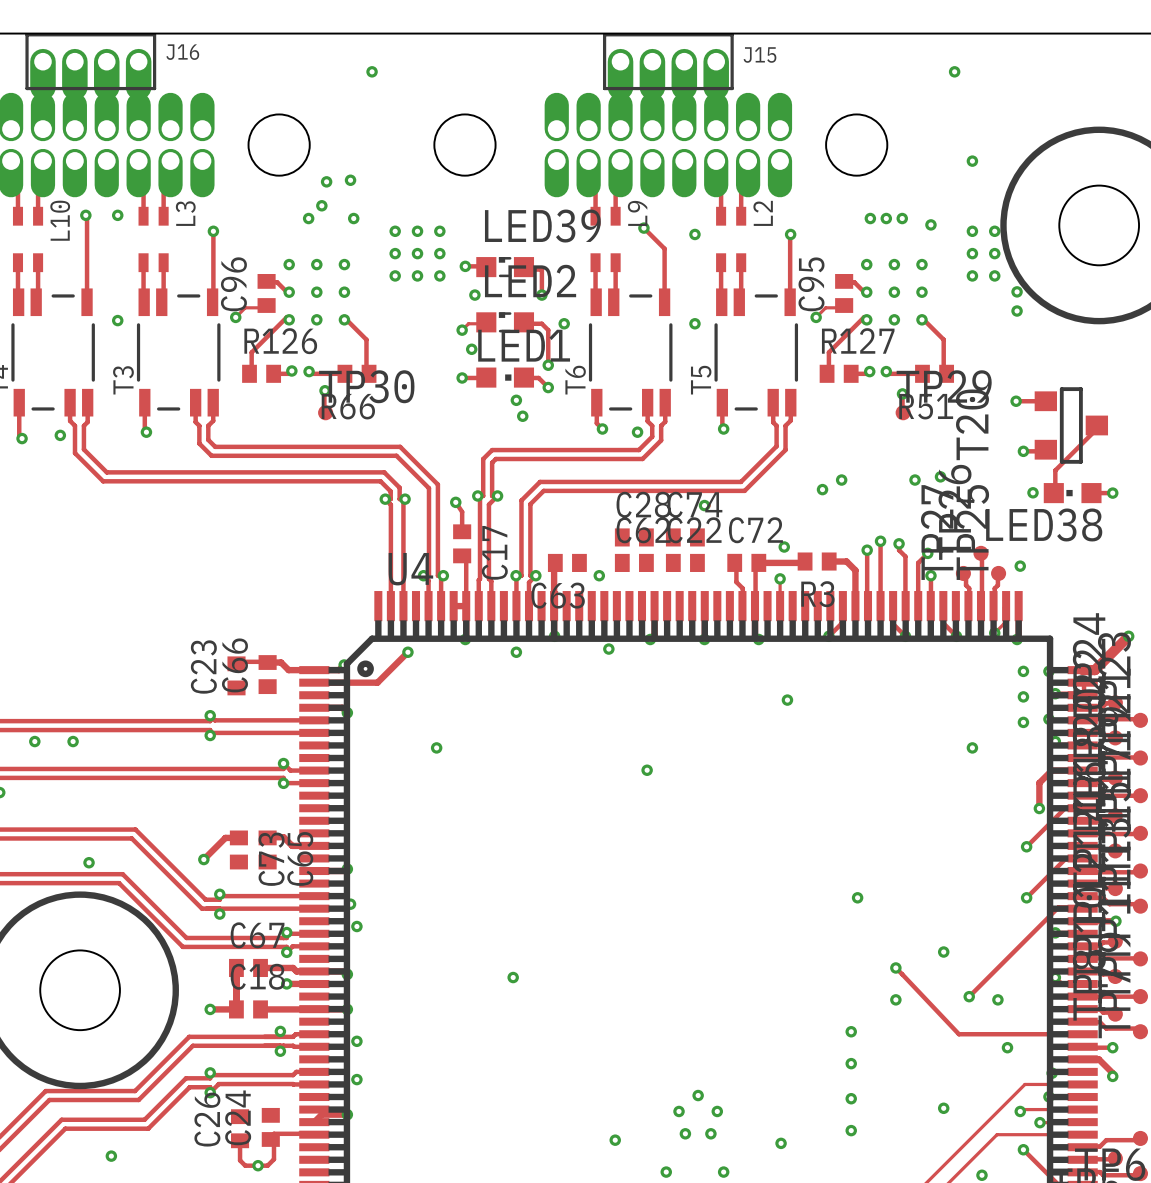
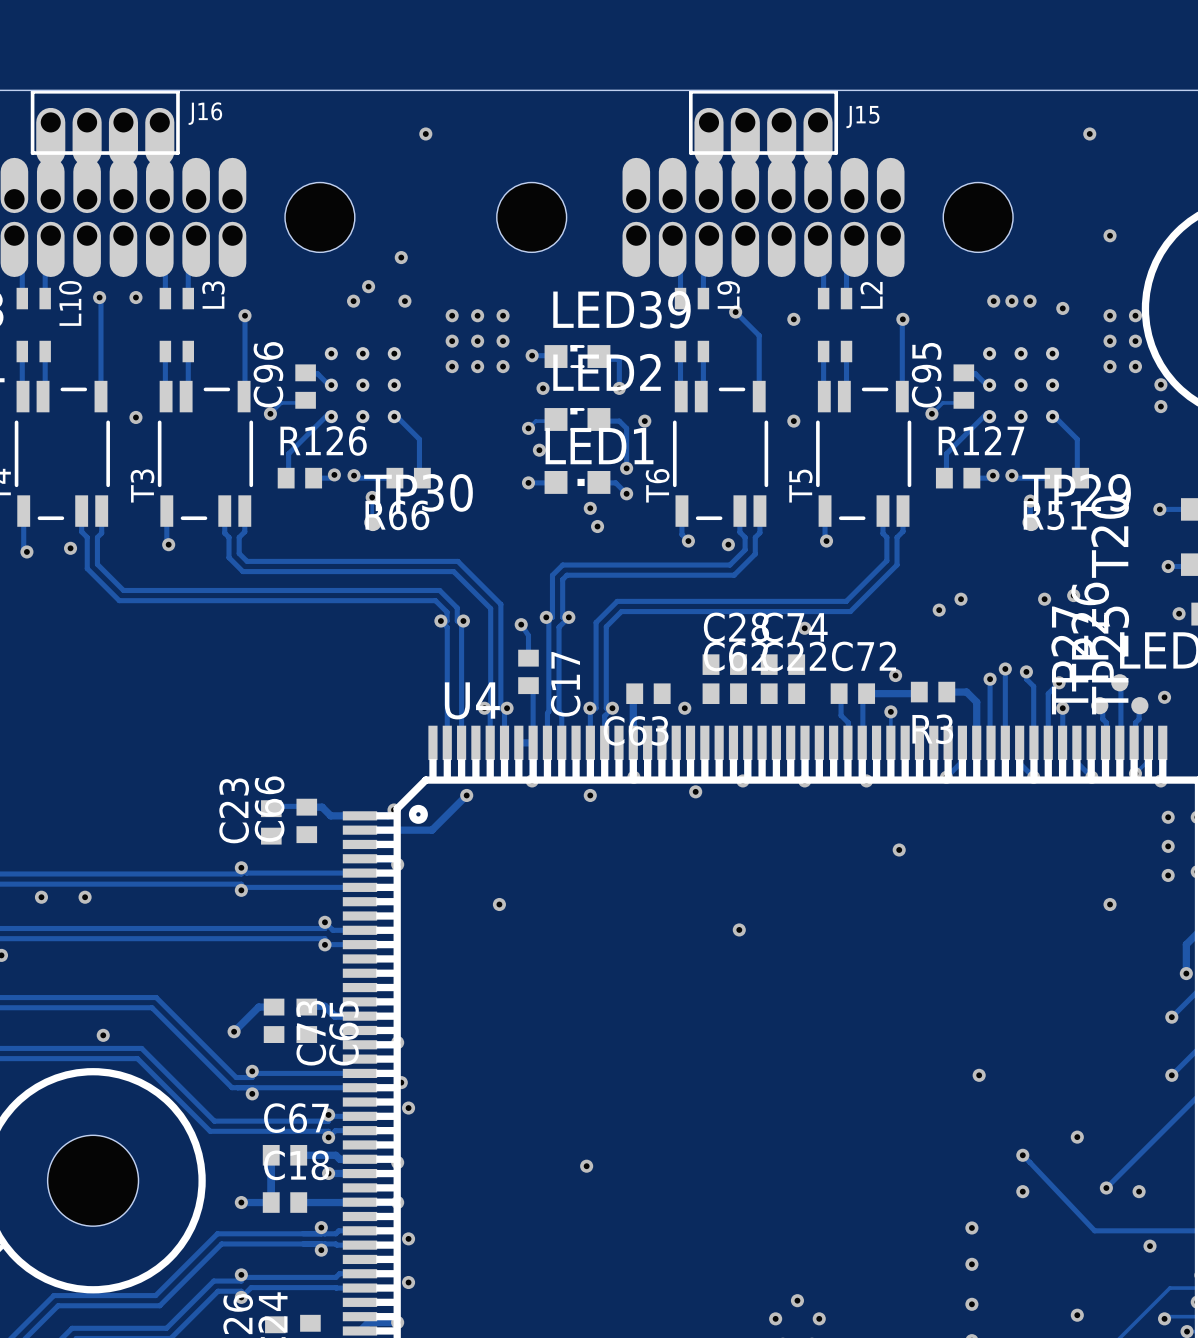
via: (326, 181) -> none

